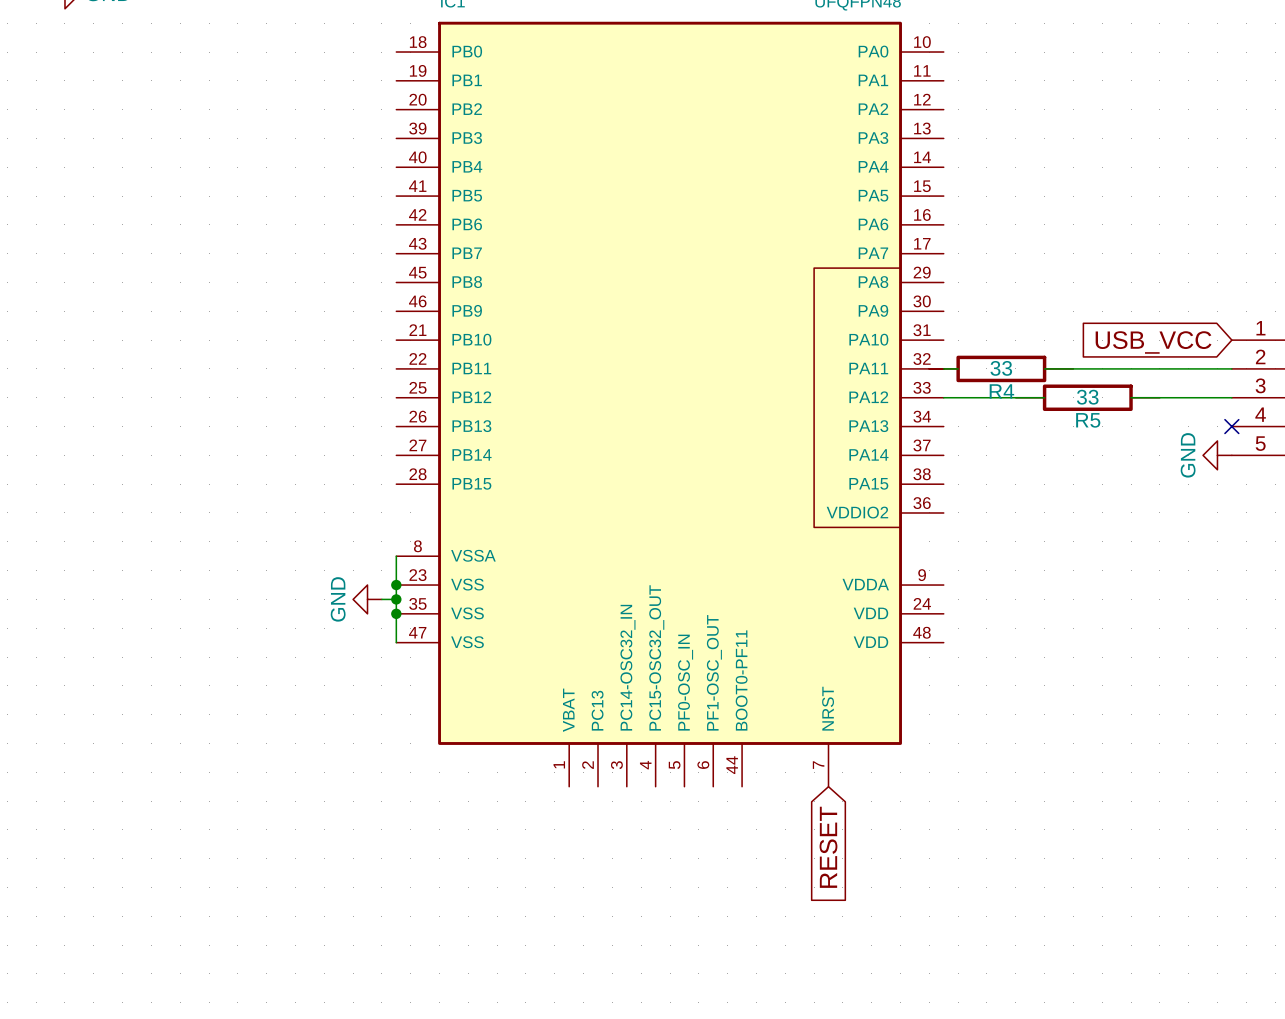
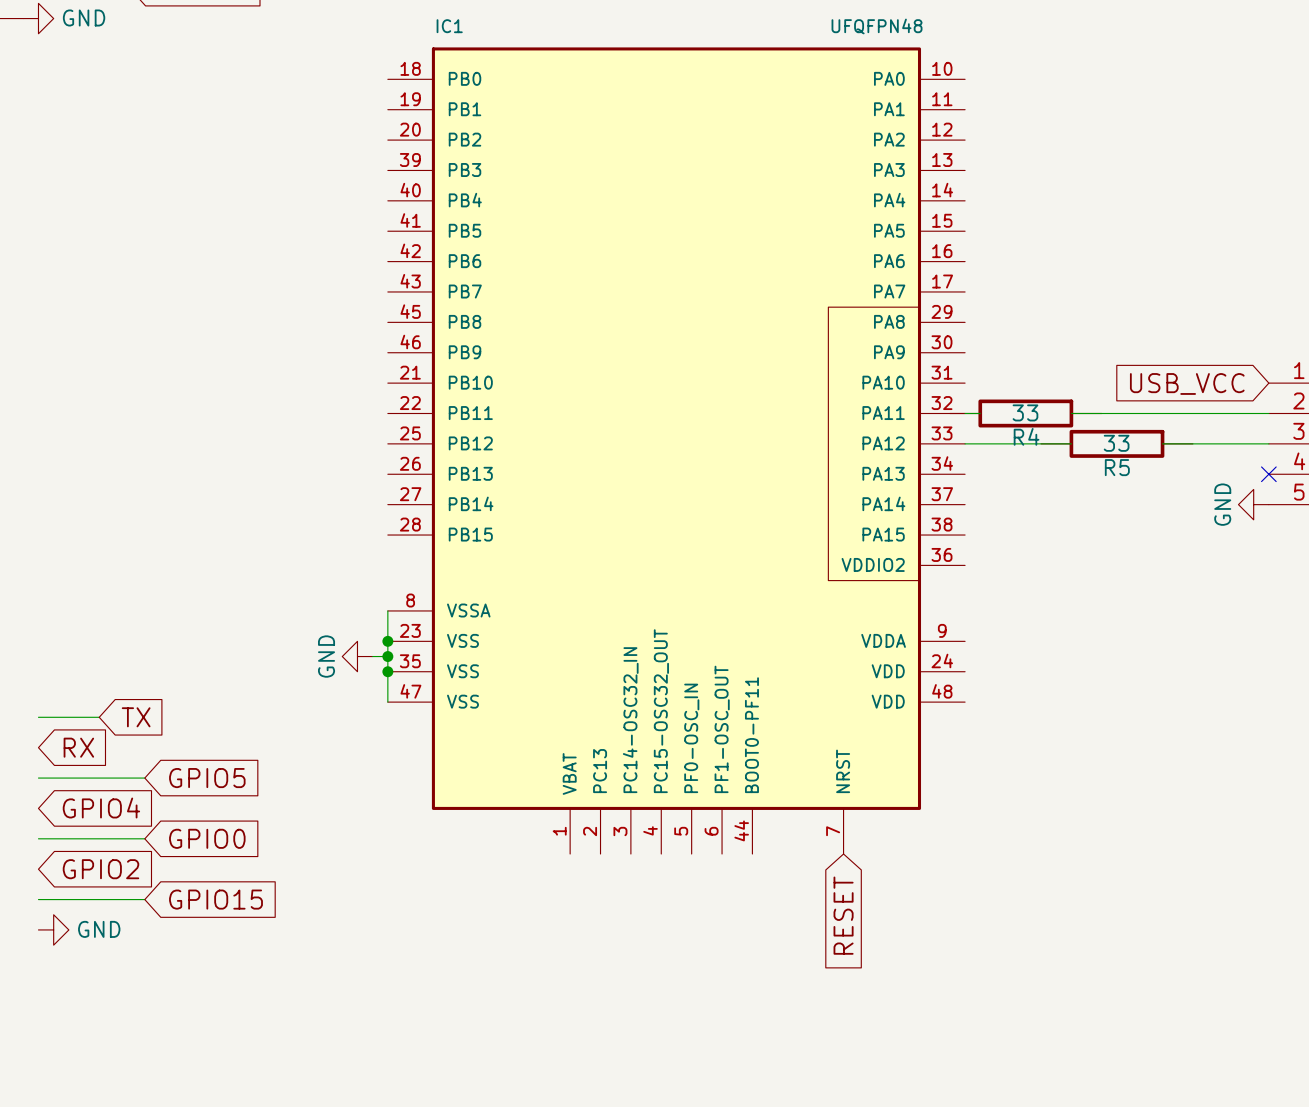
wire: none -> (38, 717) (99, 717)
global label: none -> TX (136, 717)
global label: none -> RX (78, 747)
wire: none -> (38, 778) (144, 778)
global label: none -> GPIO5 (207, 778)
global label: none -> GPIO4 (101, 808)
wire: none -> (38, 838) (144, 838)
global label: none -> GPIO0 (207, 838)
global label: none -> GPIO2 (100, 869)
wire: none -> (38, 899) (144, 899)
global label: none -> GPIO15 (216, 899)
power symbol: none -> GND (53, 929)

